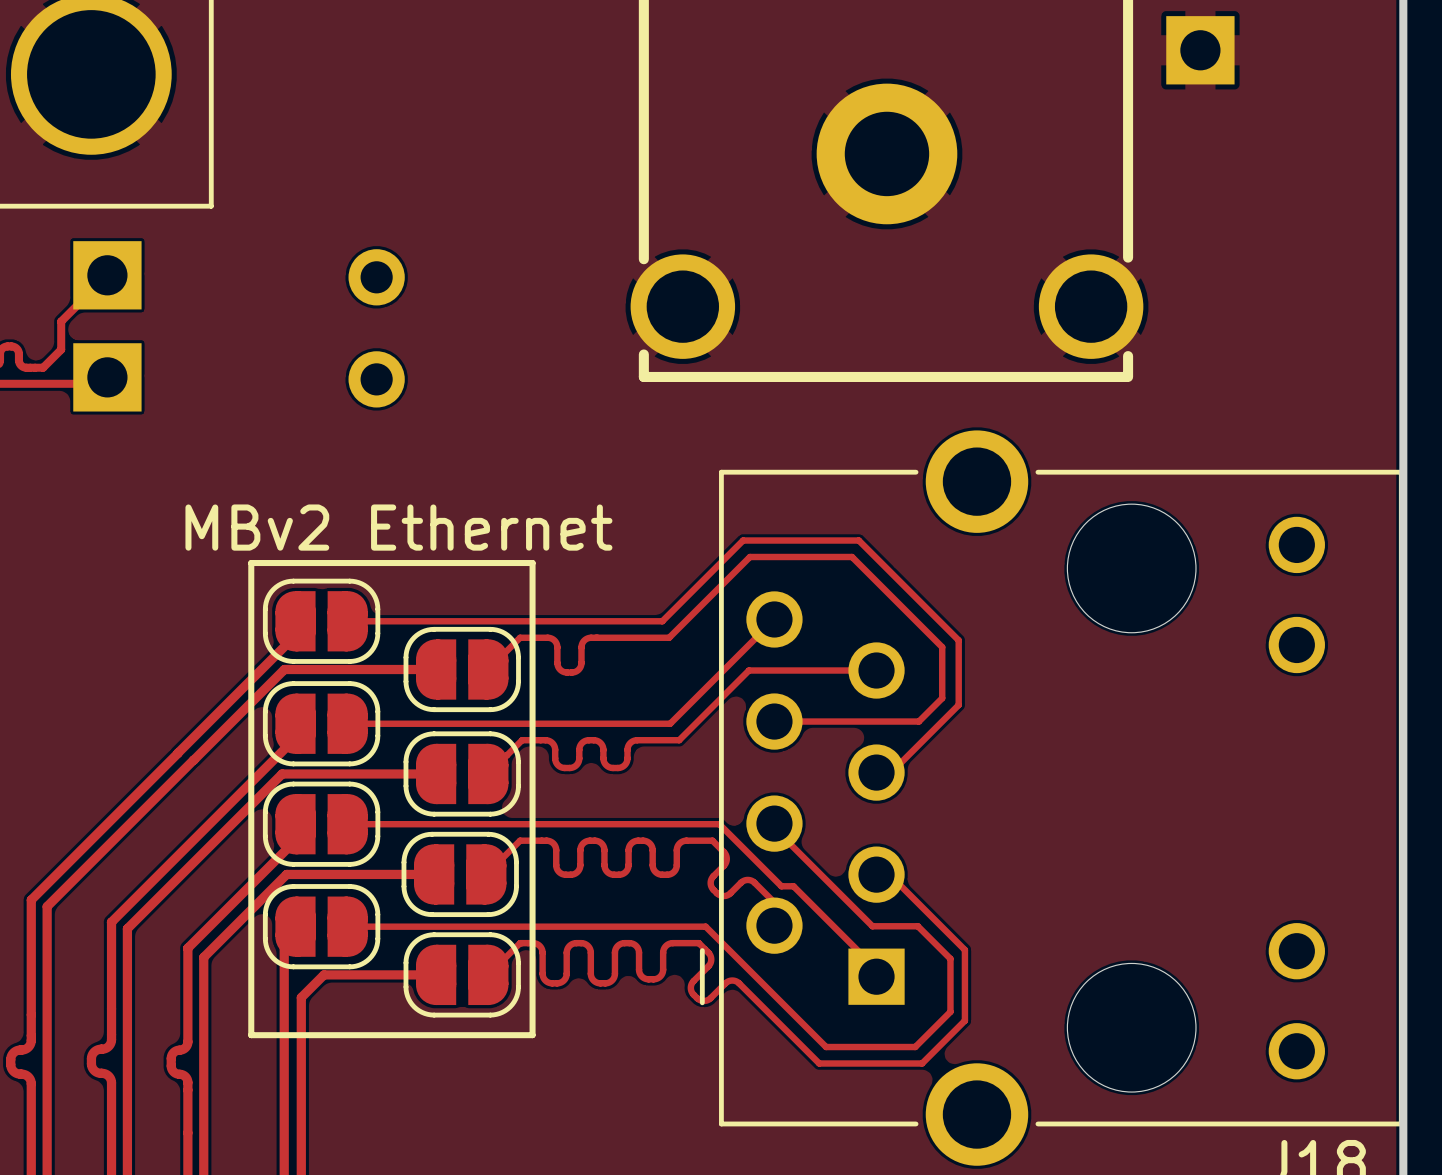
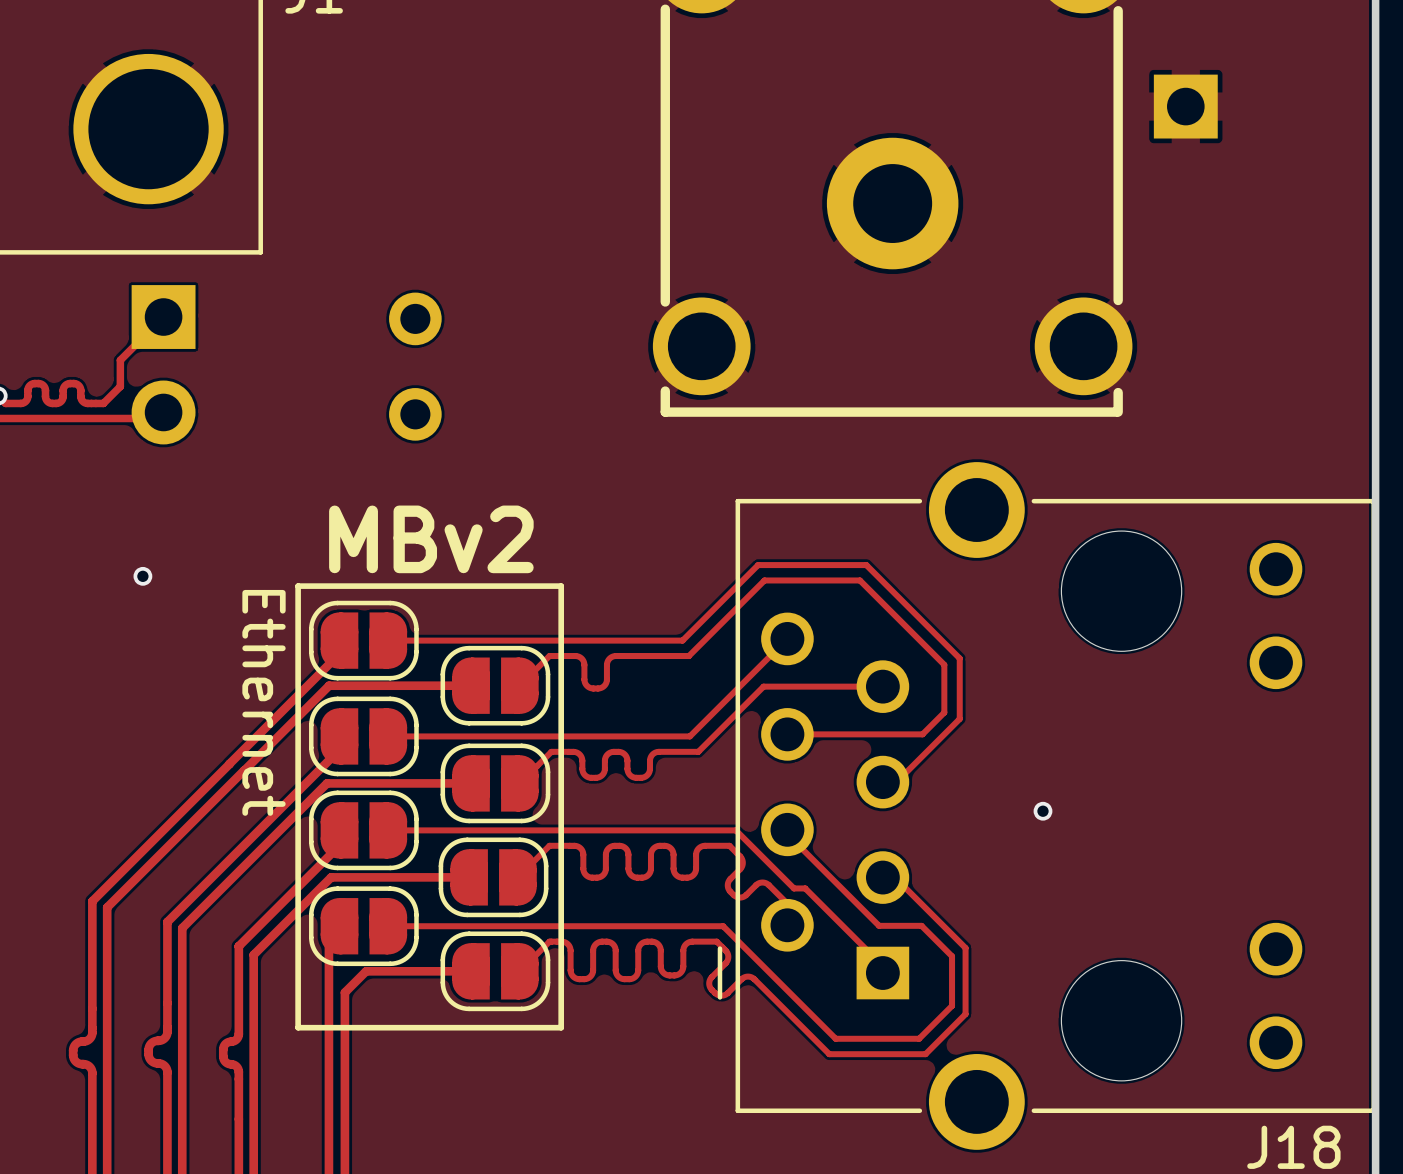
part footprint: [73, 343, 142, 412] -> [131, 380, 196, 445]
text: none -> MBv2 (431, 539)
text: MBv2 Ethernet (398, 527) -> Ethernet (264, 702)
via: none -> (142, 576)
via: none -> (1042, 811)

